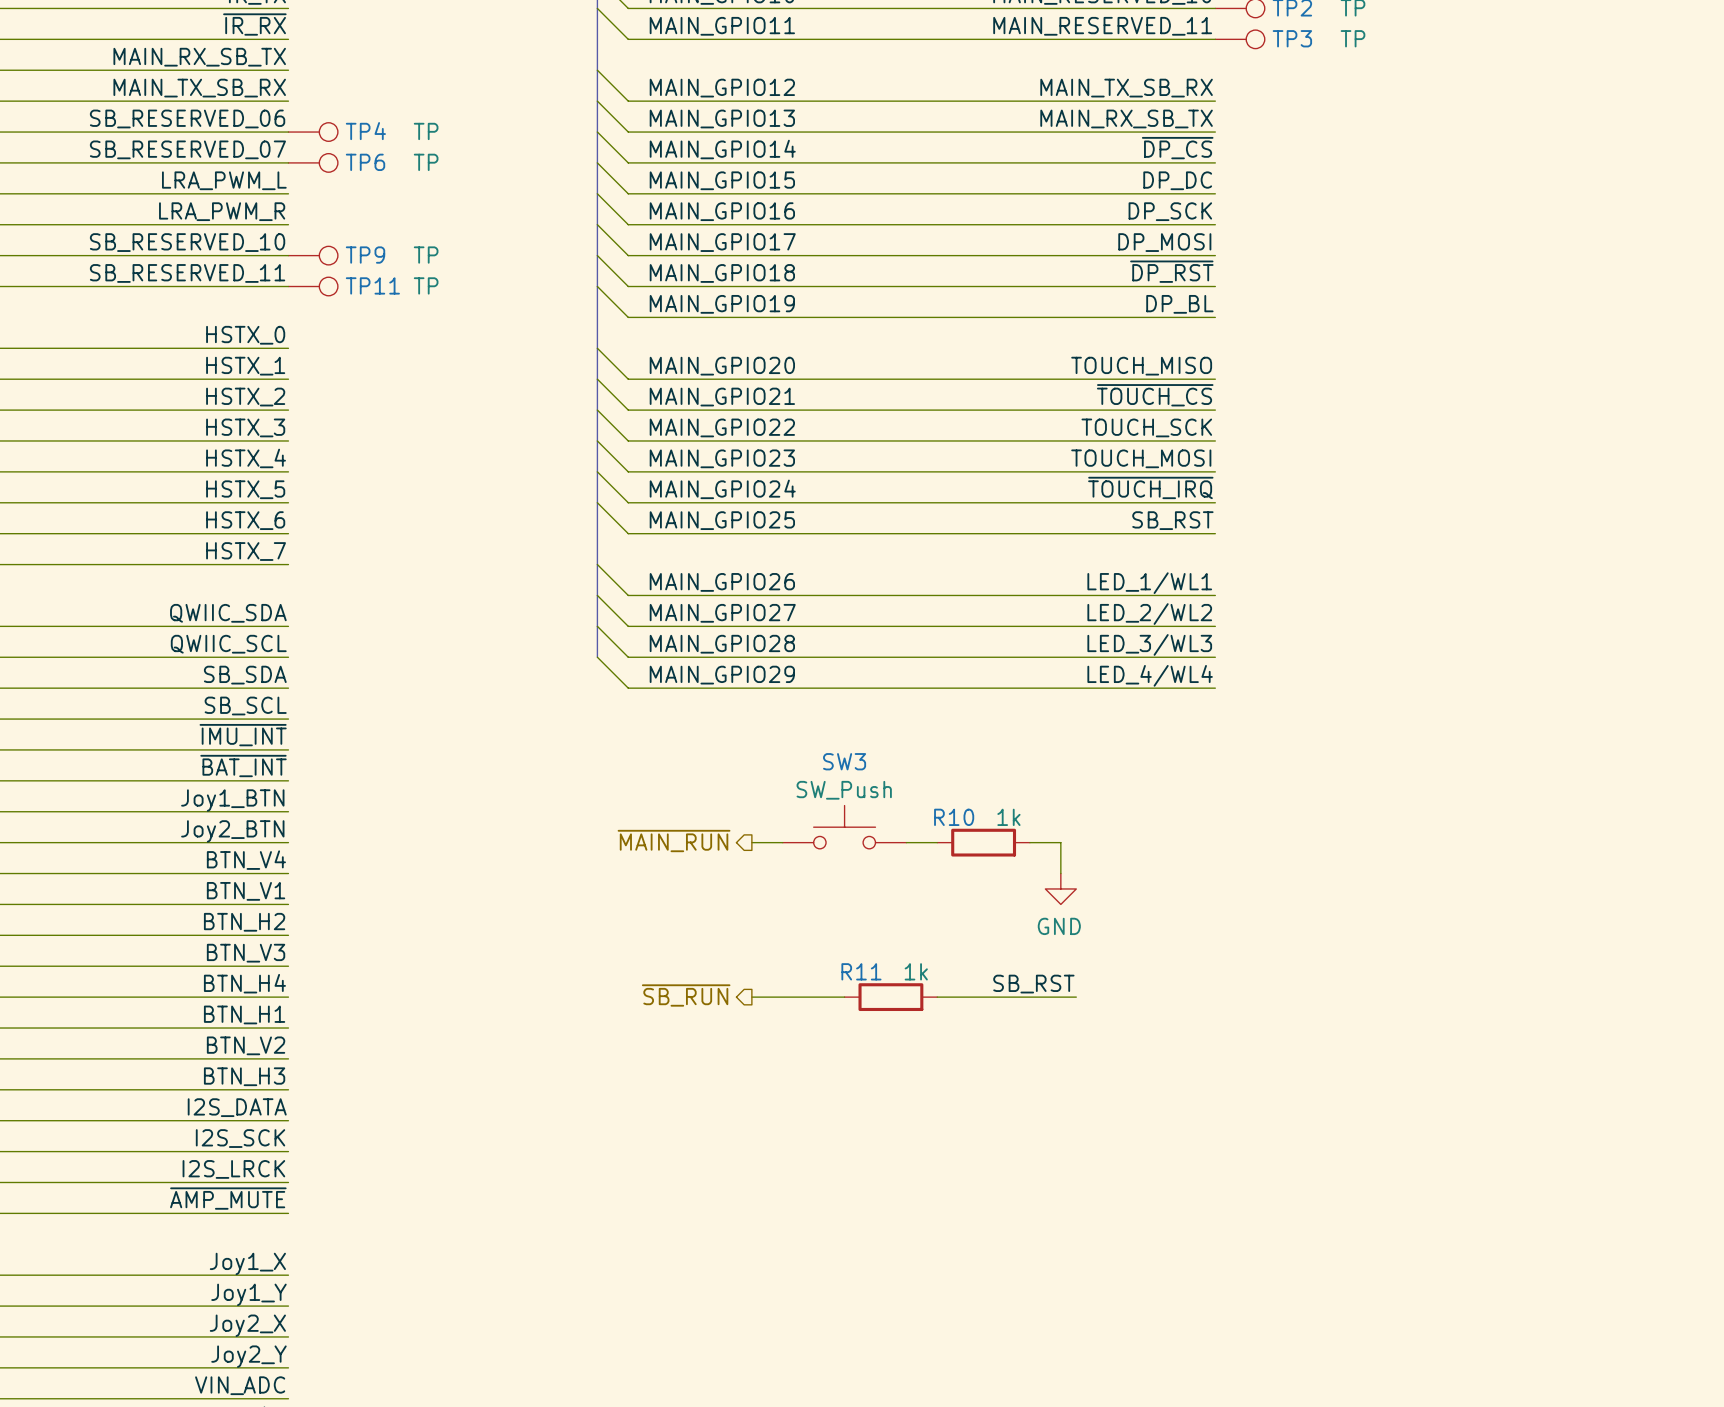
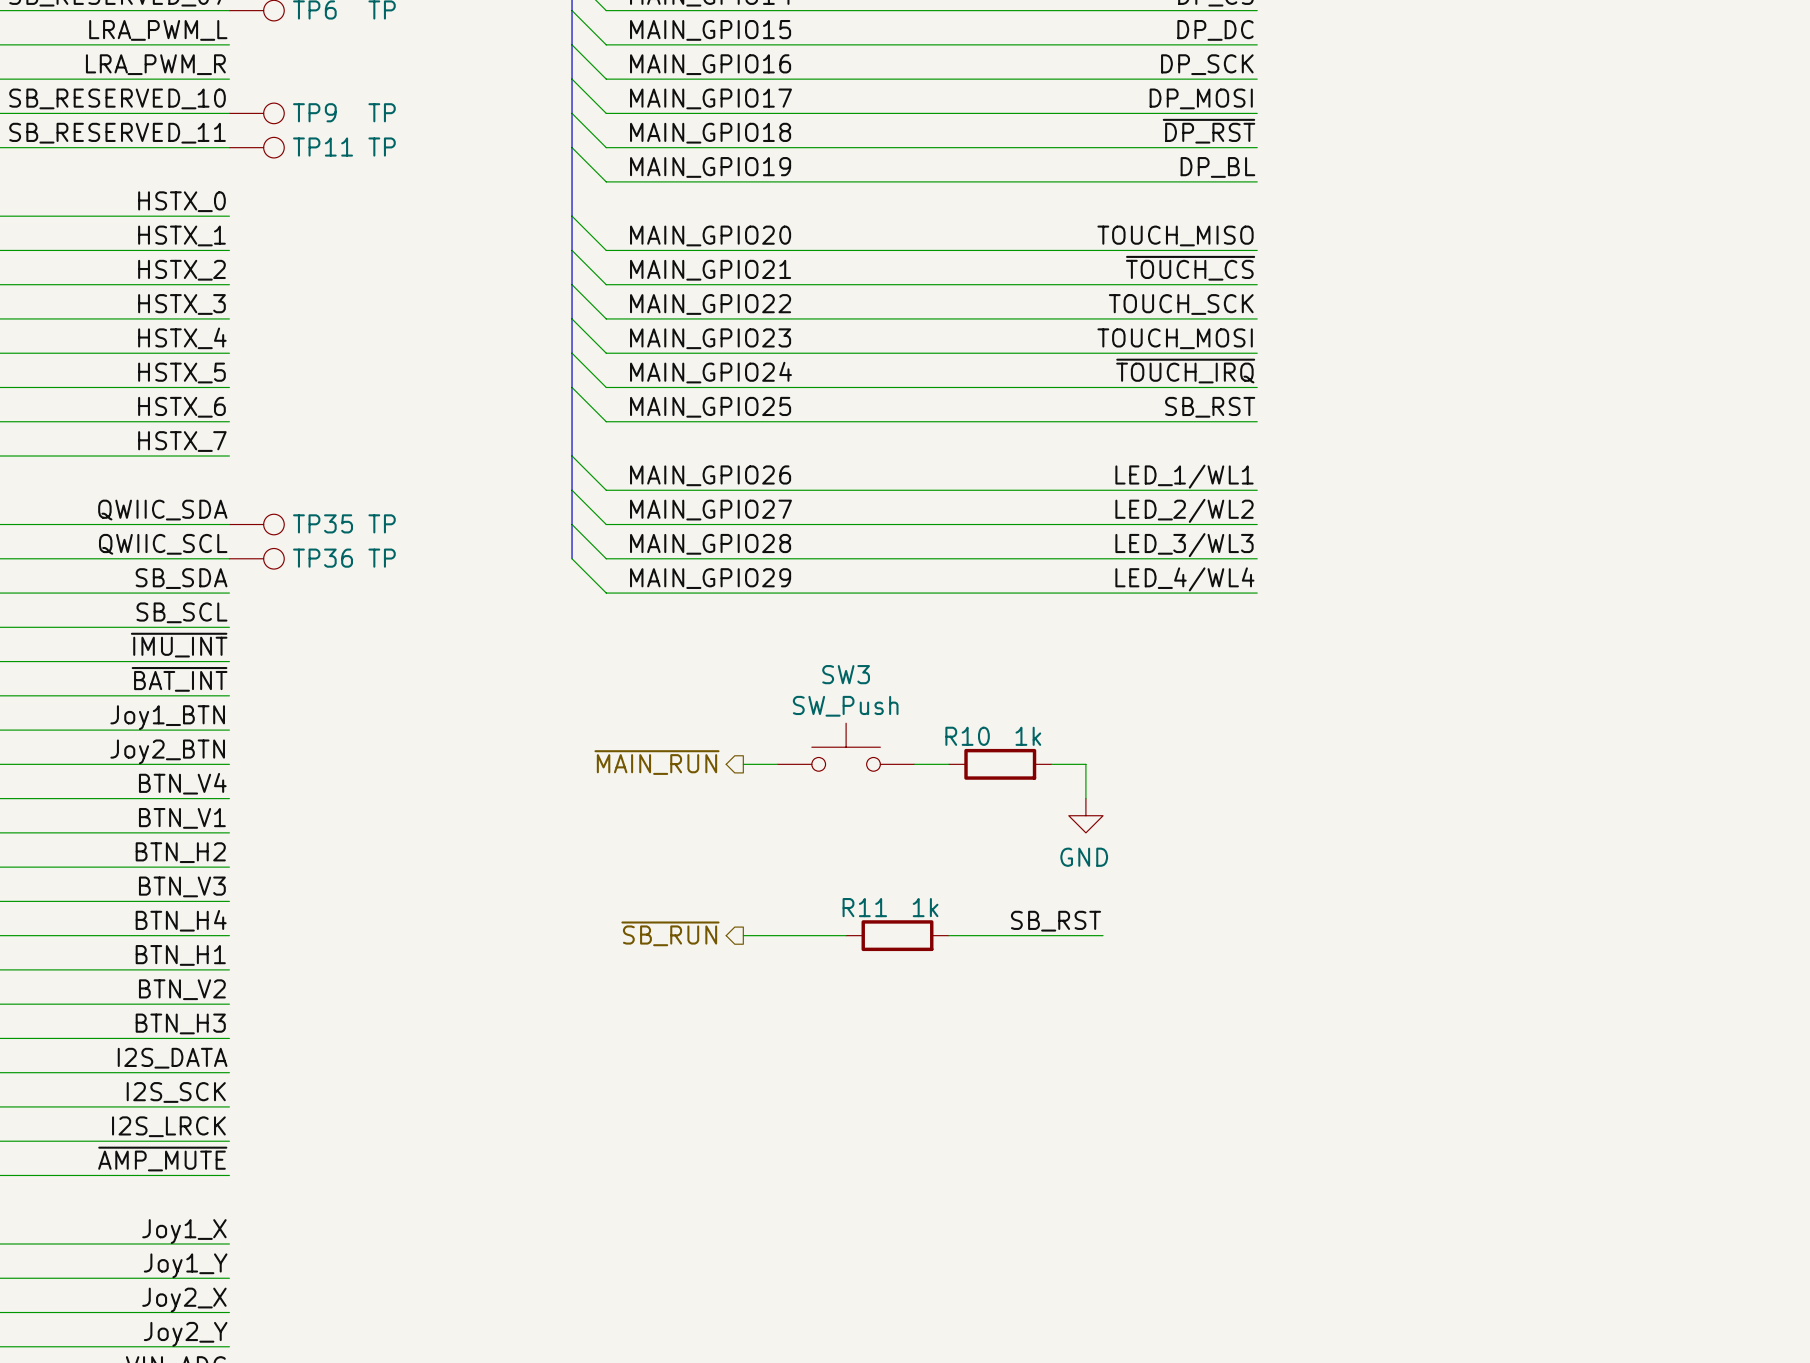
TP35: none -> TP (256, 524)
TP36: none -> TP (256, 558)

